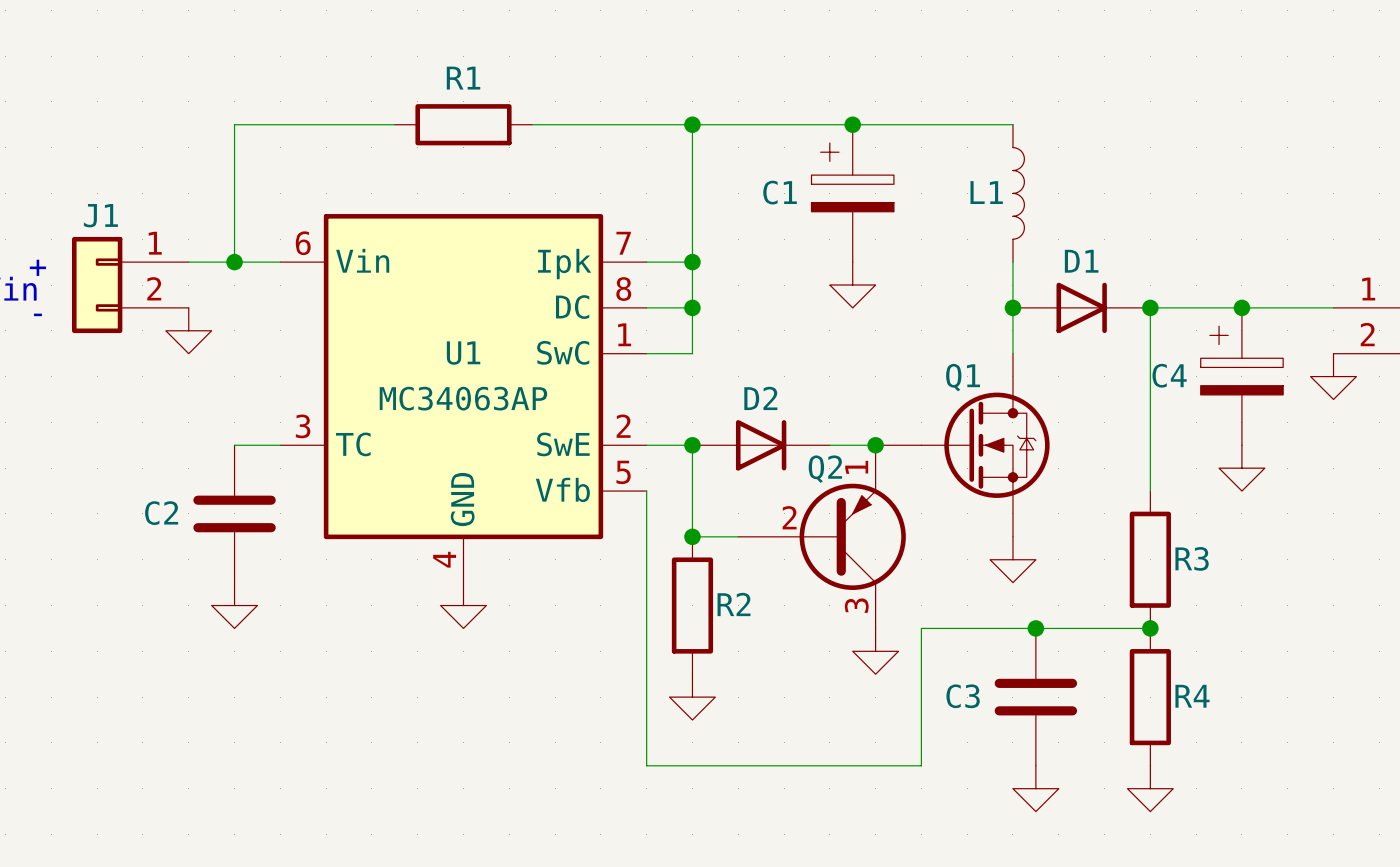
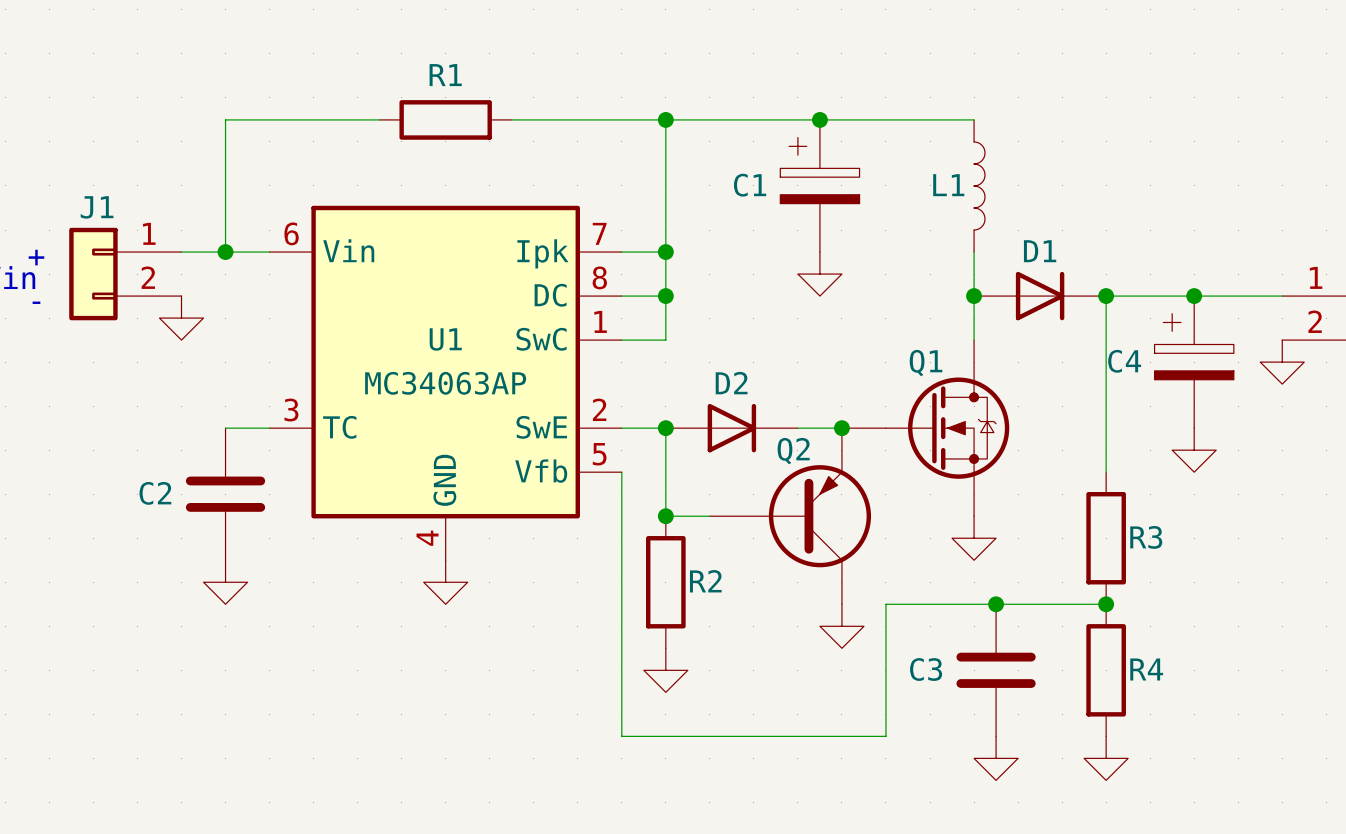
Q2 pin number: 1 (856, 467) -> none
Q2 pin number: 2 (789, 517) -> none
Q2 pin number: 3 (856, 605) -> none

